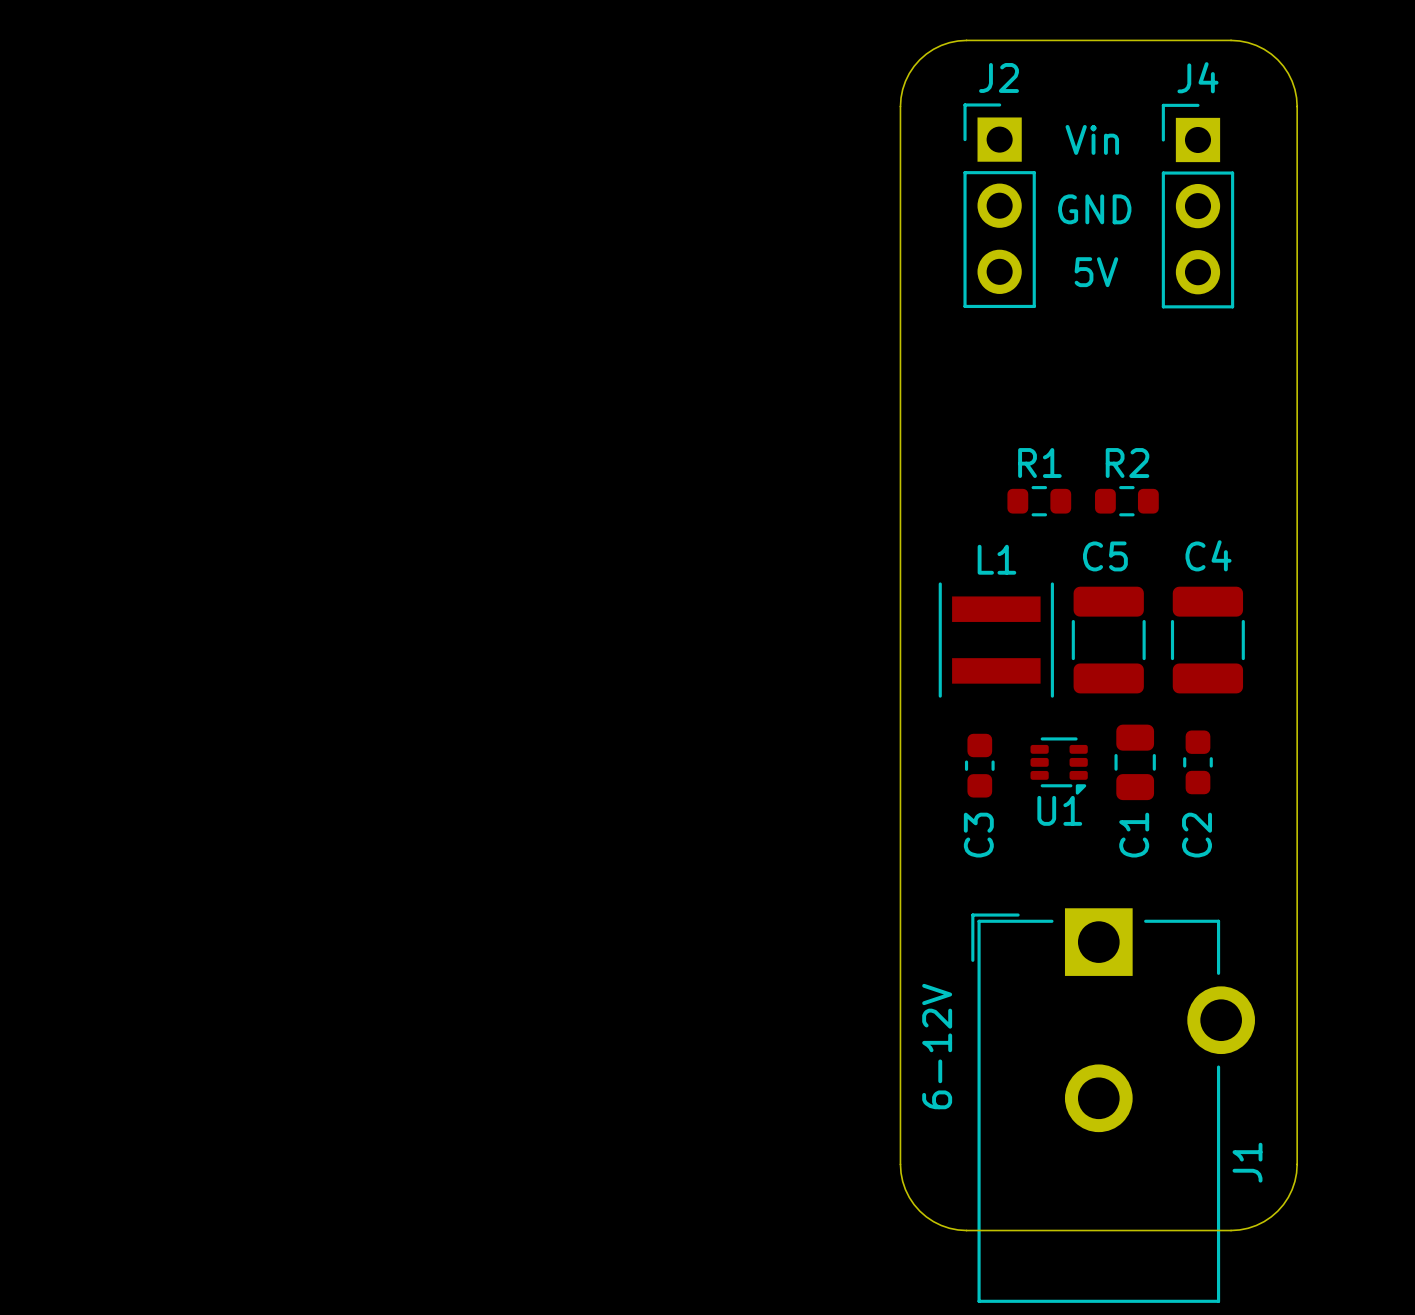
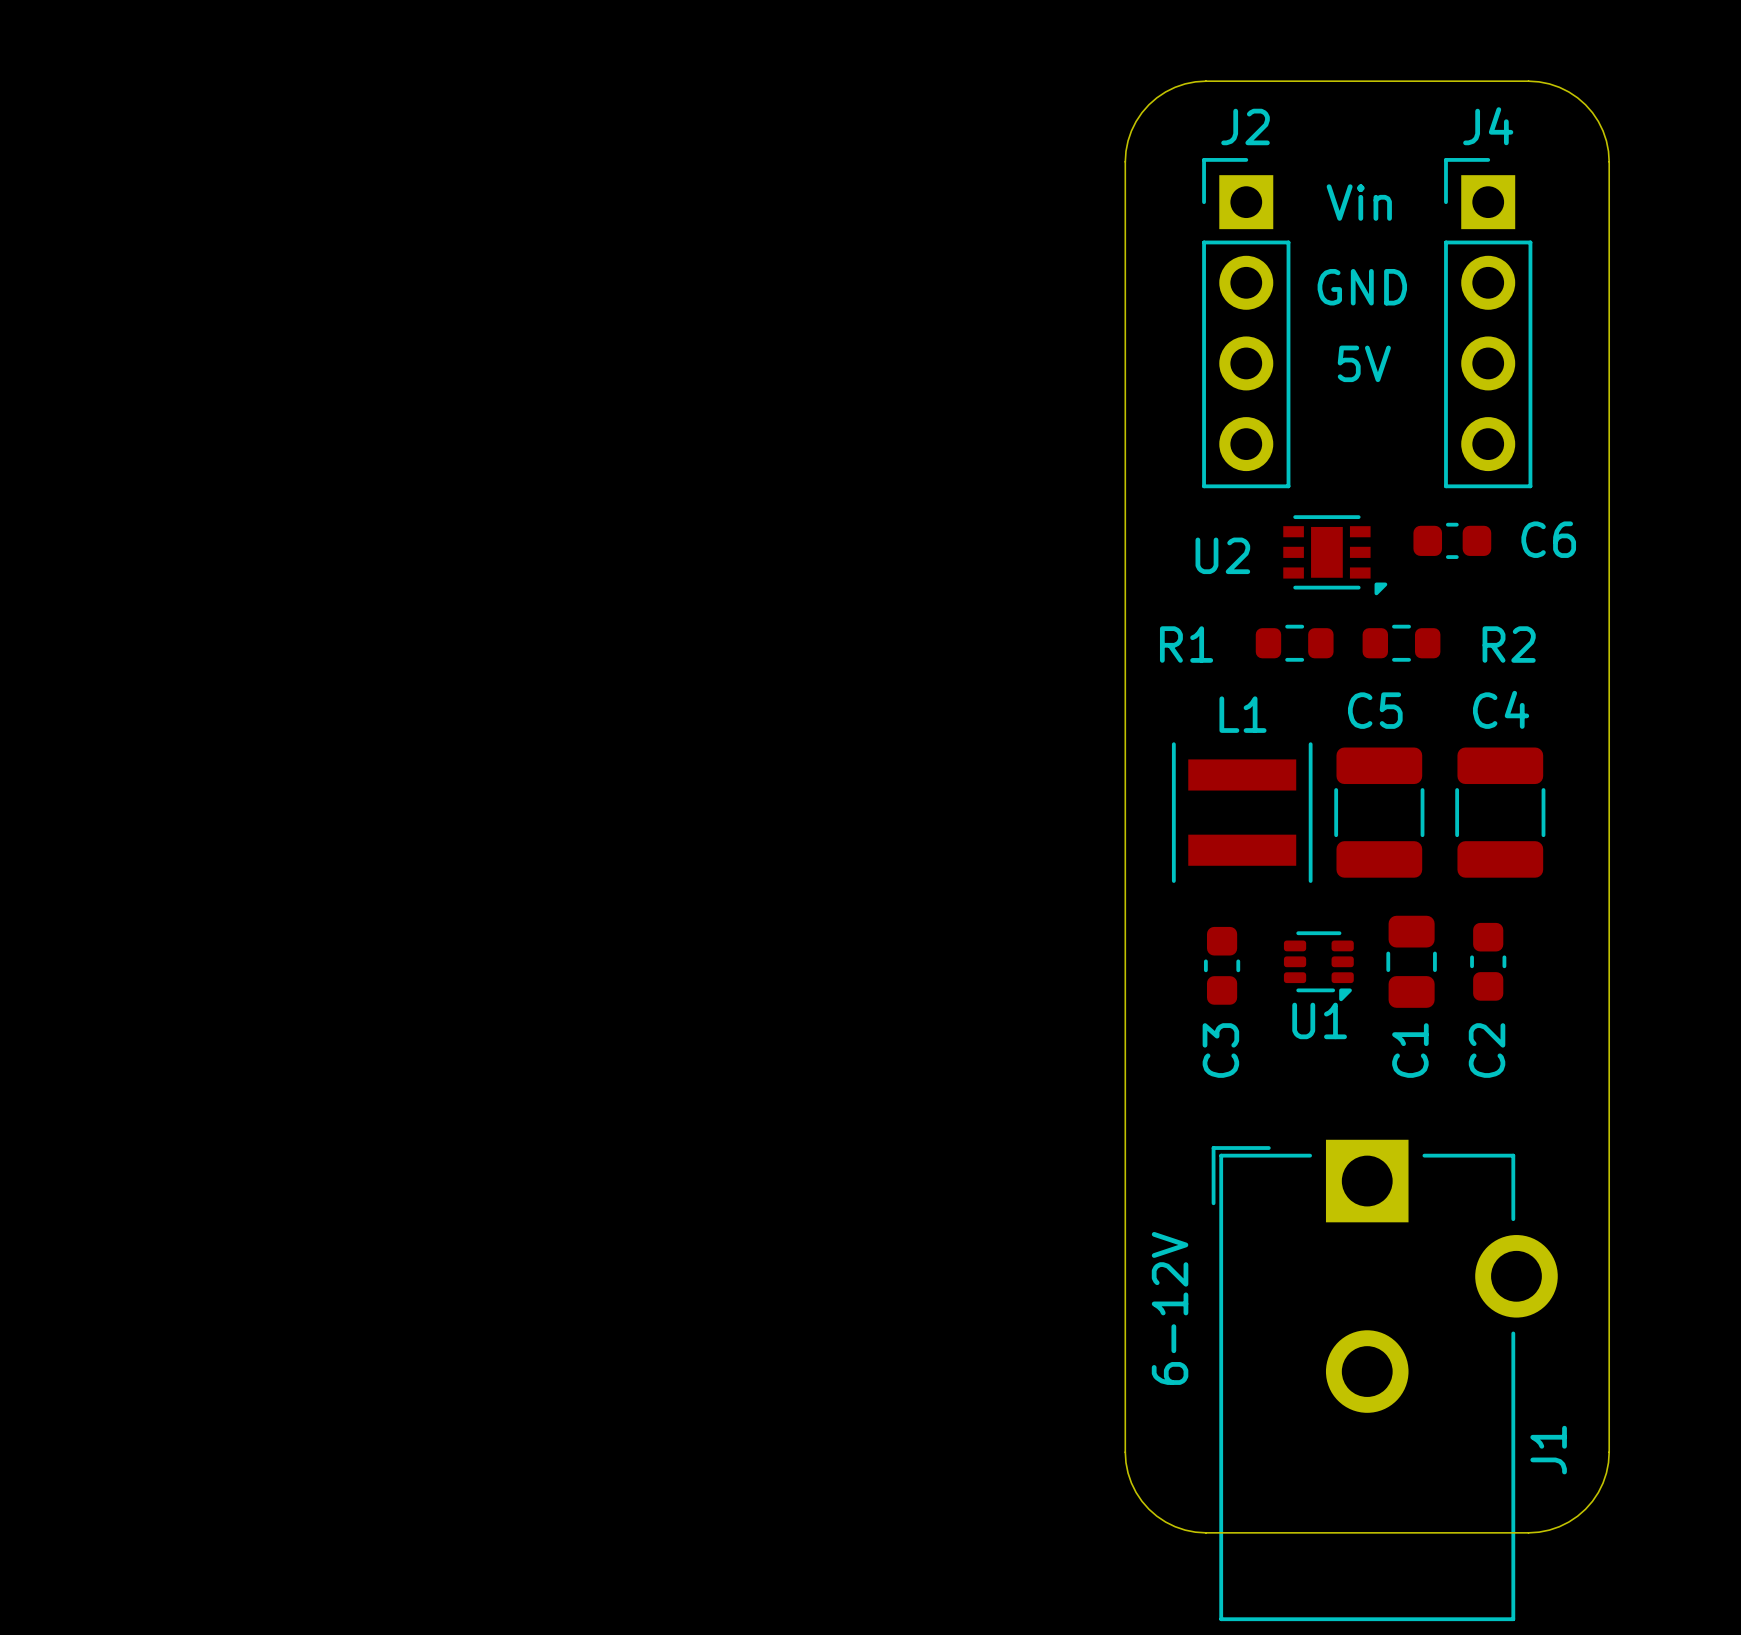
J2 footprint: [963, 103, 1036, 309] -> [1202, 158, 1291, 489]
J4 footprint: [1161, 103, 1235, 309] -> [1444, 158, 1533, 489]
C6: none -> (1452, 540)
U2: none -> (1335, 555)
R1 name position: R1 (1039, 463) -> R1 (1186, 644)
R2 name position: R2 (1127, 463) -> R2 (1509, 644)

